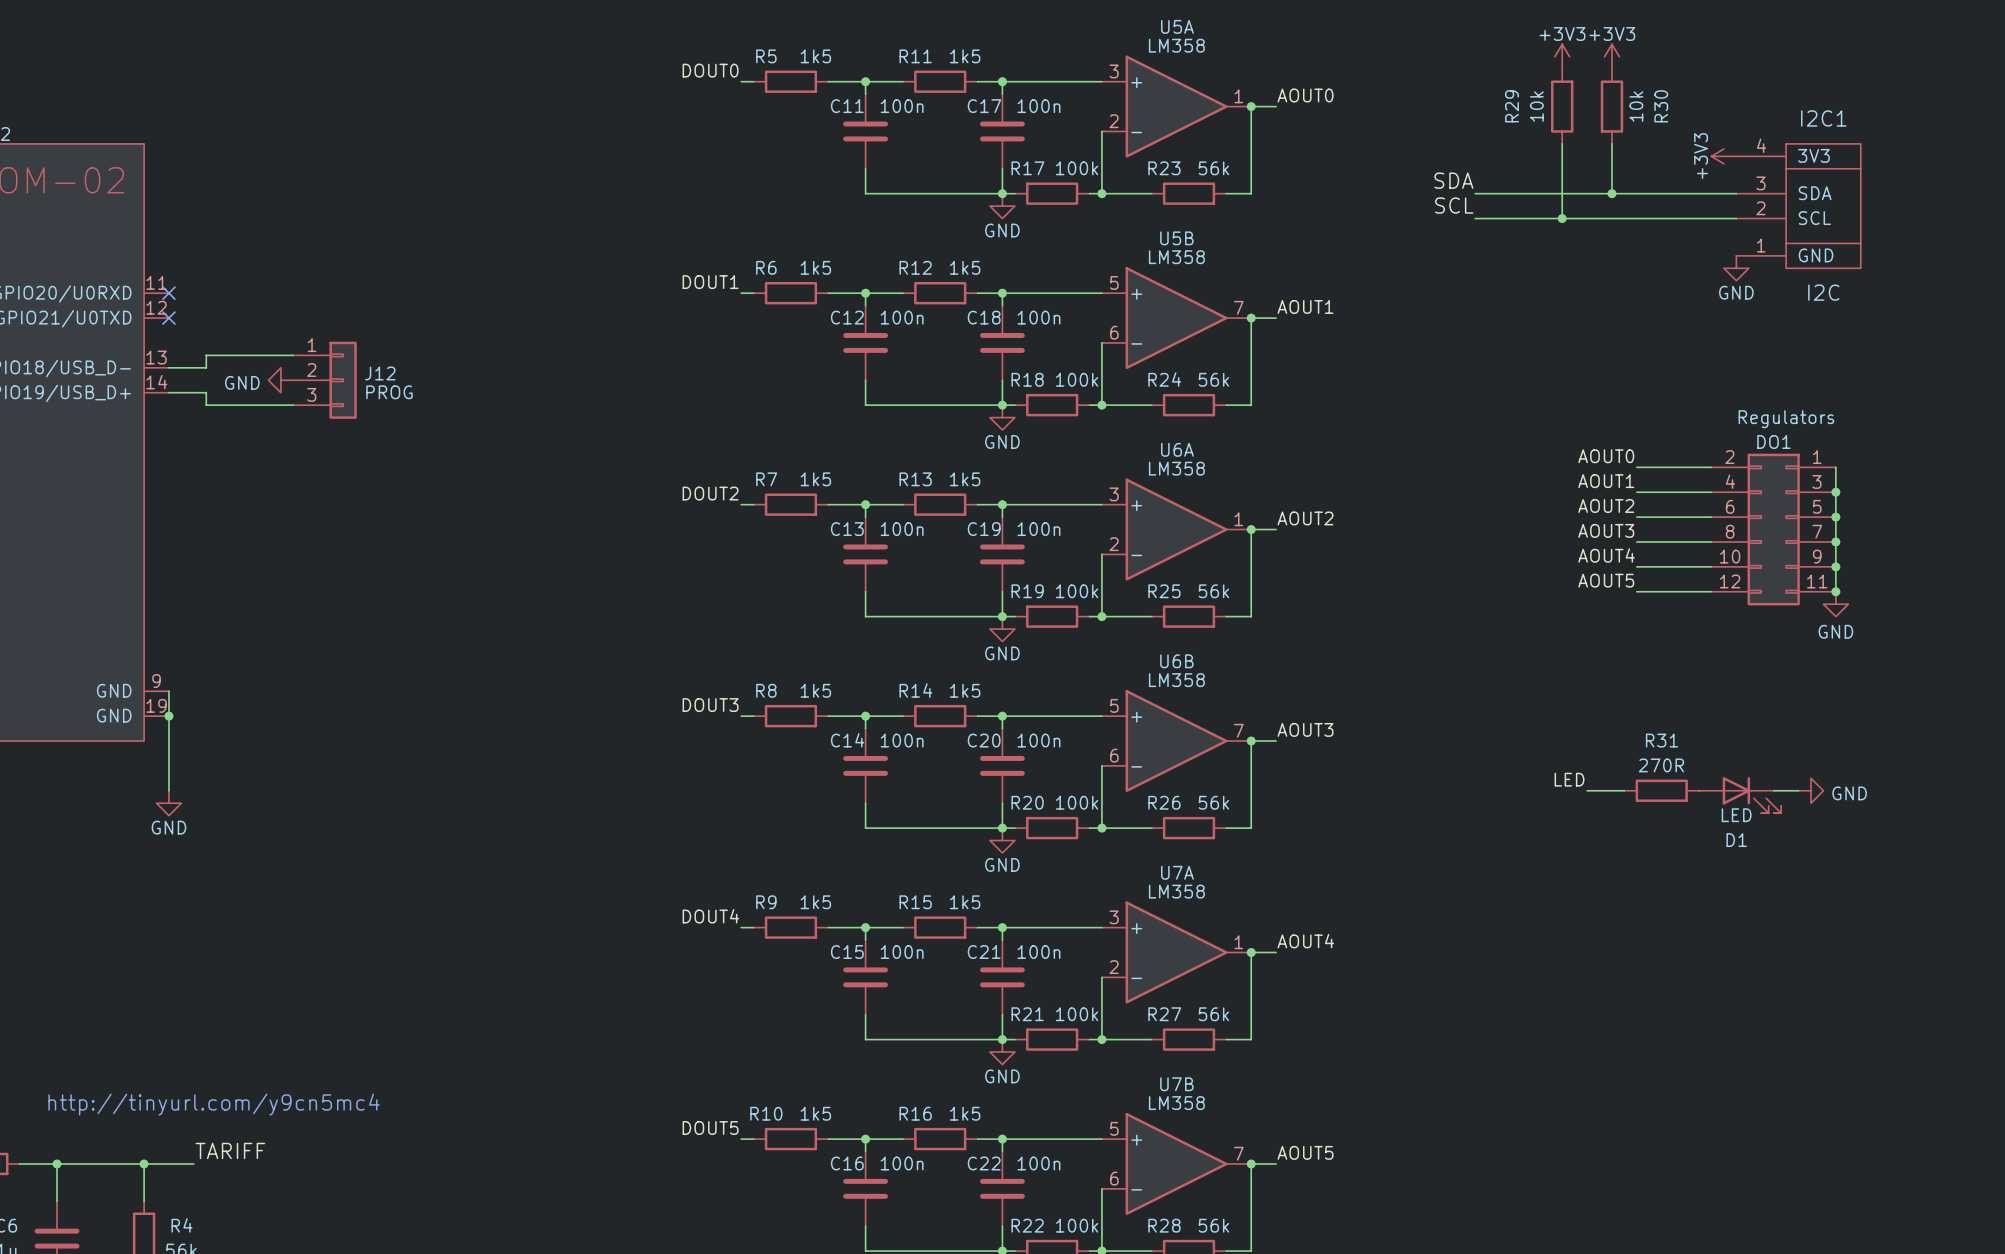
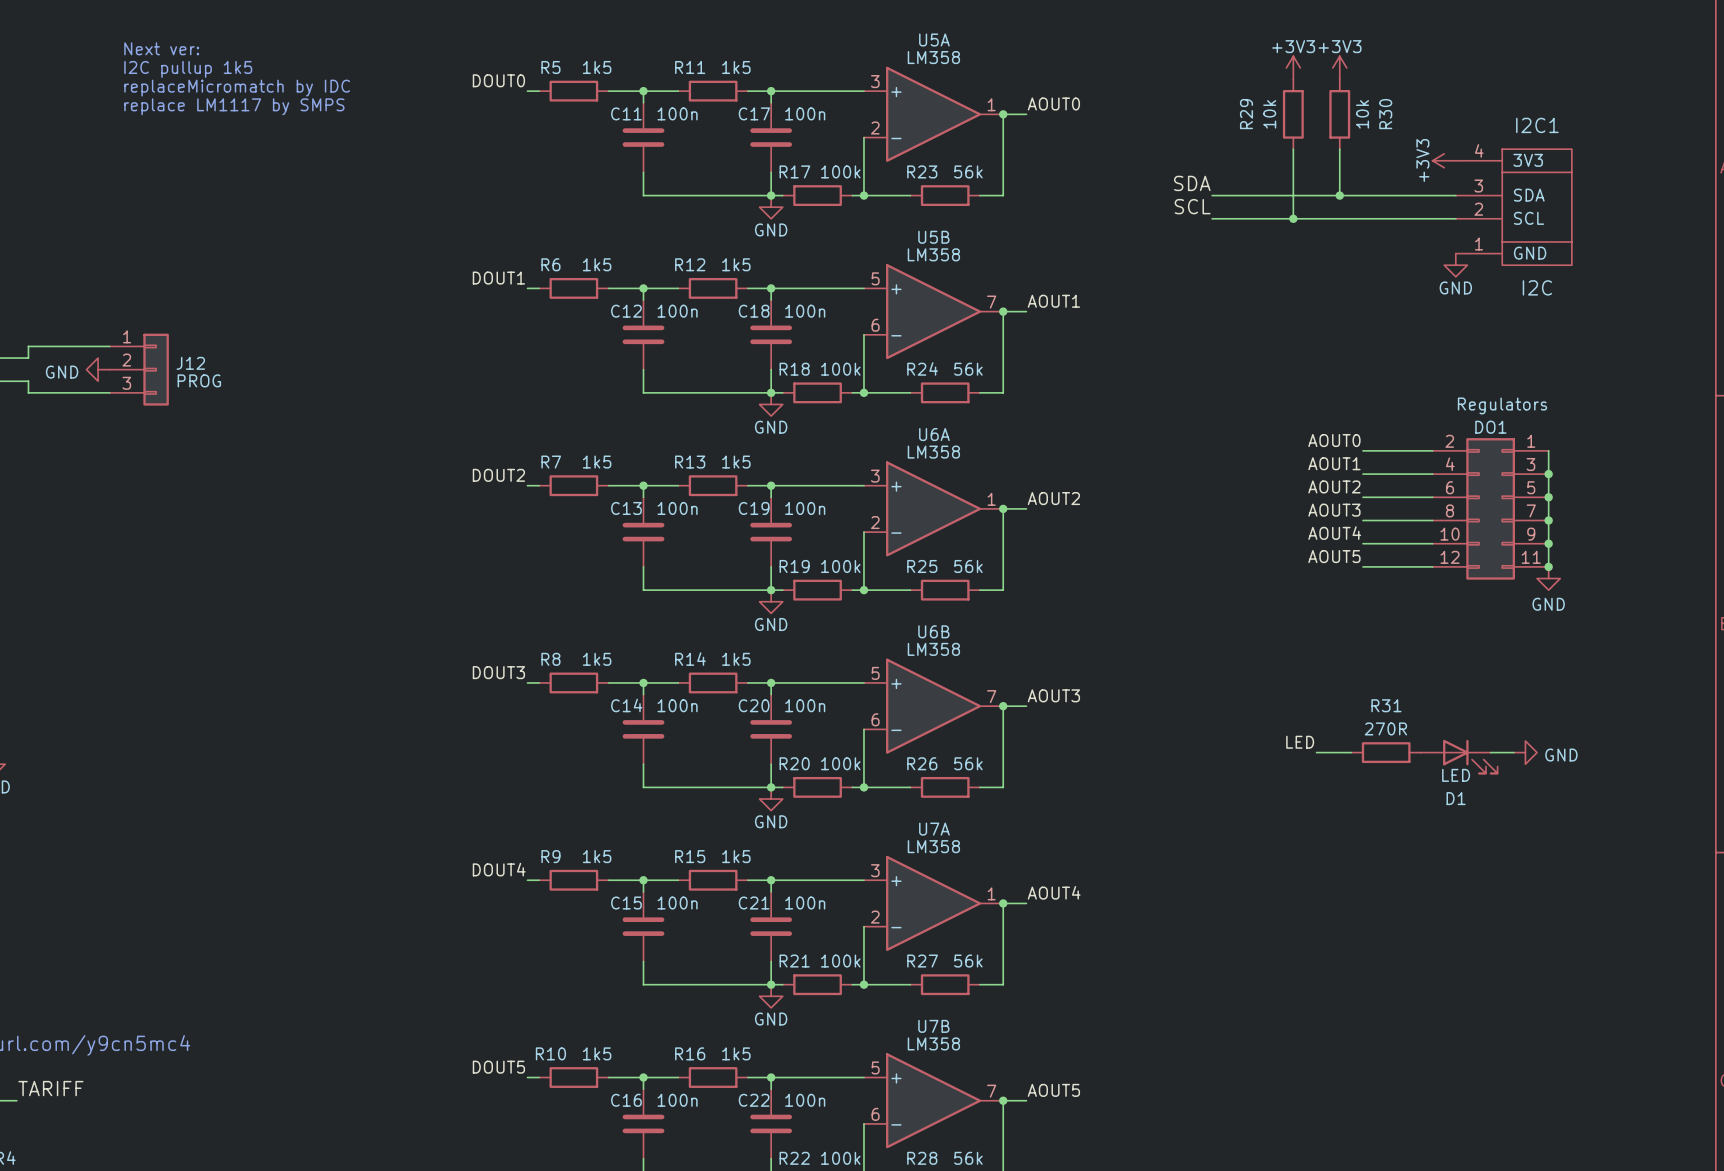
text: none -> Next ver: (161, 48)
text: none -> I2C pullup 1k5 (188, 69)
text: none -> replaceMicromatch by IDC (237, 88)
text: none -> replace LM1117 by SMPS (234, 106)

